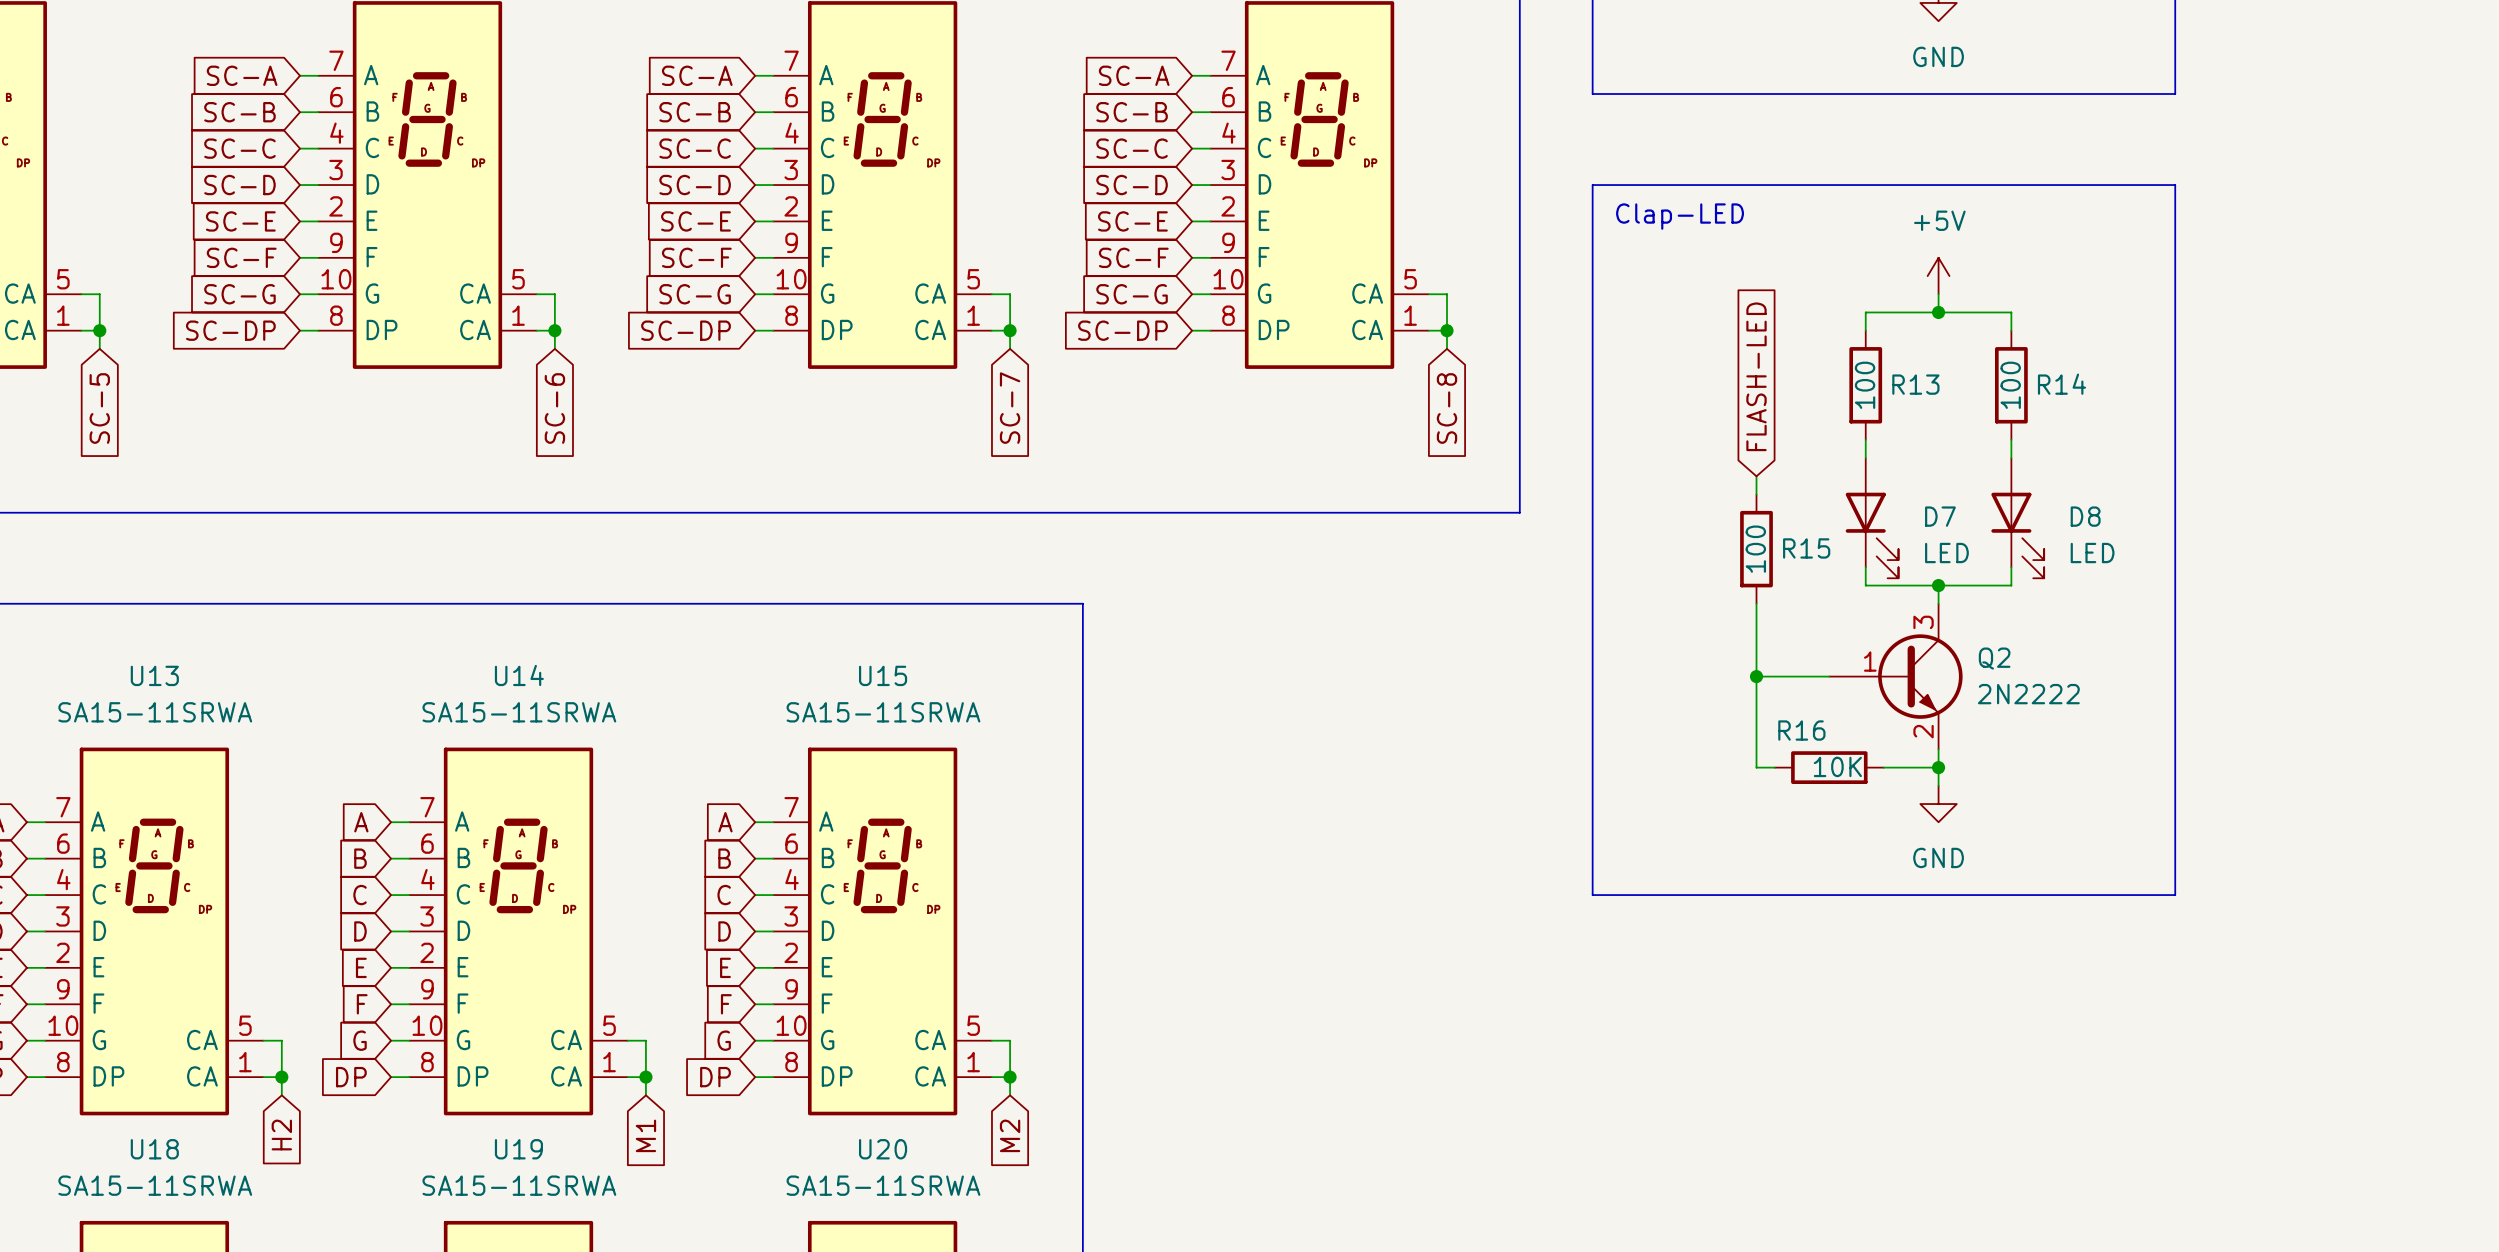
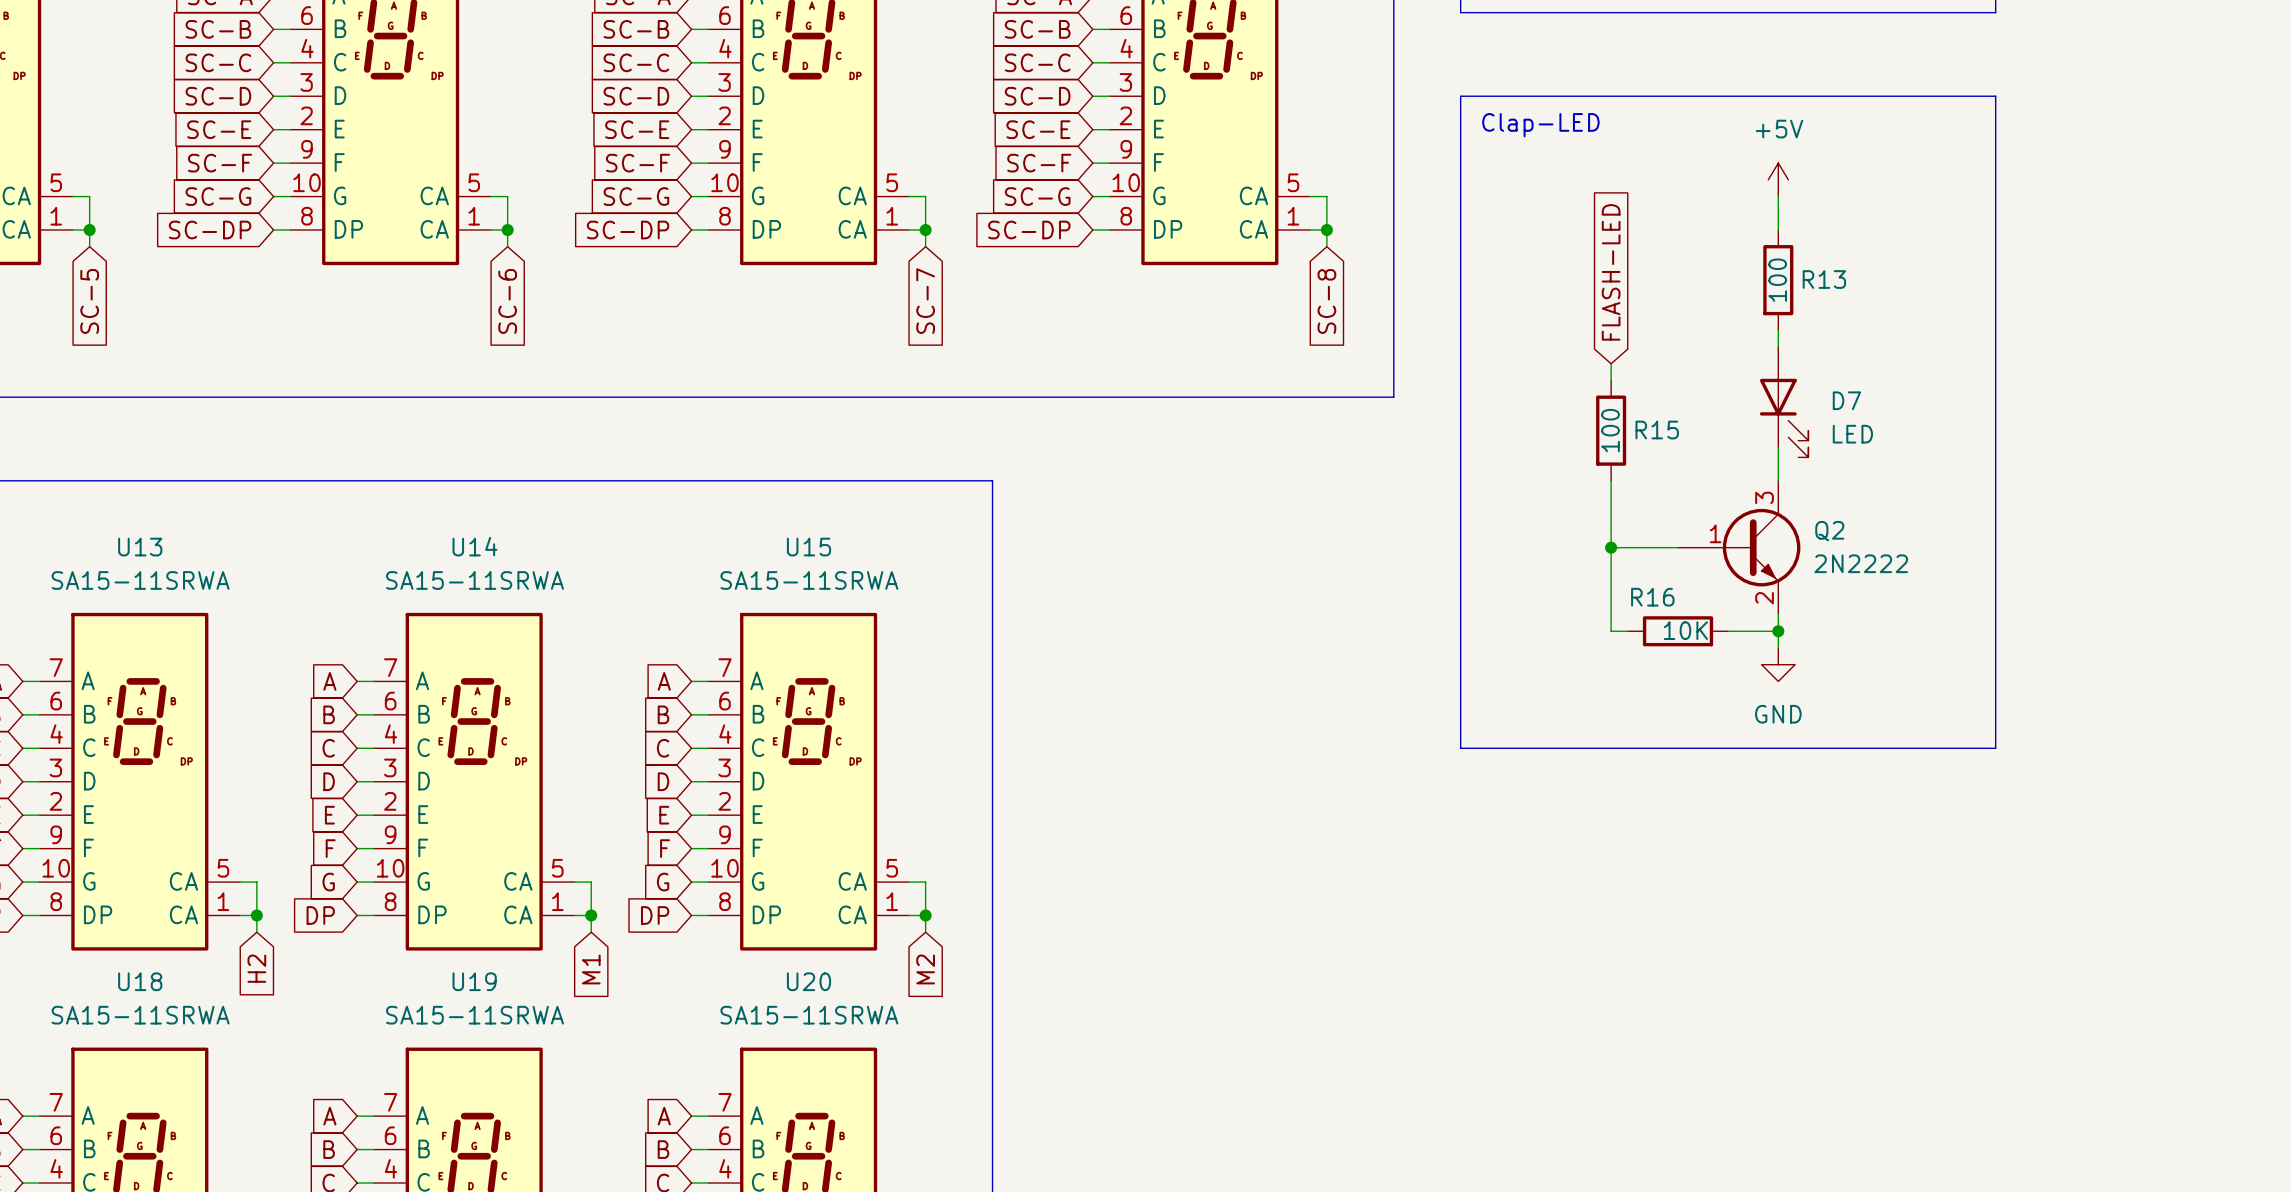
junction: (1938, 312) -> none
wire: (1865, 330) (1865, 312) (2011, 312) (2011, 330) -> none
R13 position: (1865, 385) -> (1778, 280)
R14: 100 (2011, 385) -> none
wire: (1865, 439) (1865, 458) -> (1778, 213) (1778, 230)
wire: (2011, 439) (2011, 458) -> (1778, 330) (1778, 347)
D7 position: (1872, 518) -> (1784, 402)
D8: LED (2017, 518) -> none
wire: (1865, 567) (1865, 585) (2011, 585) (2011, 567) -> none
wire: none -> (1778, 447) (1778, 464)
junction: (1938, 585) -> none

